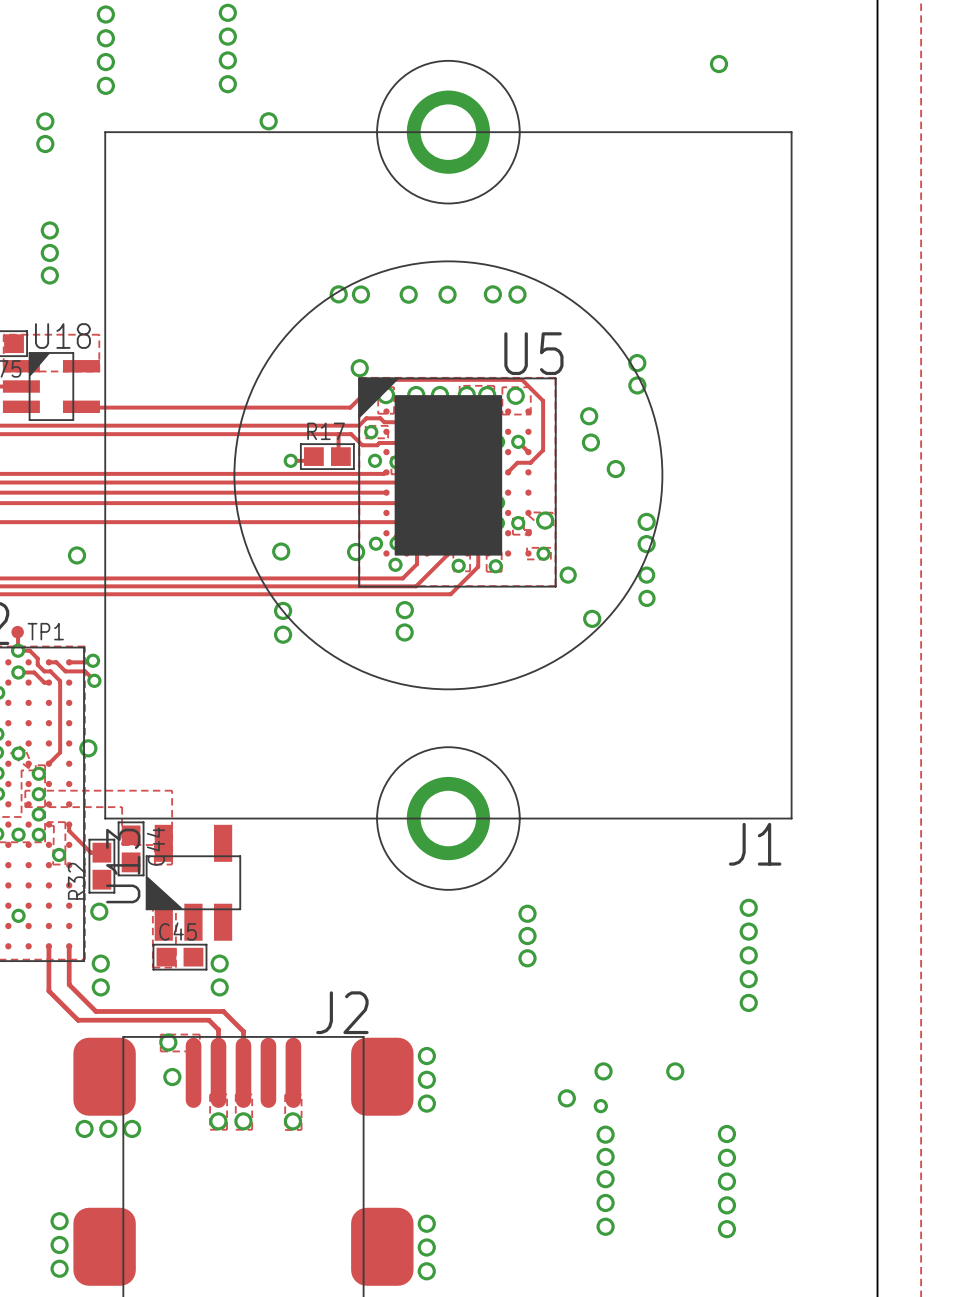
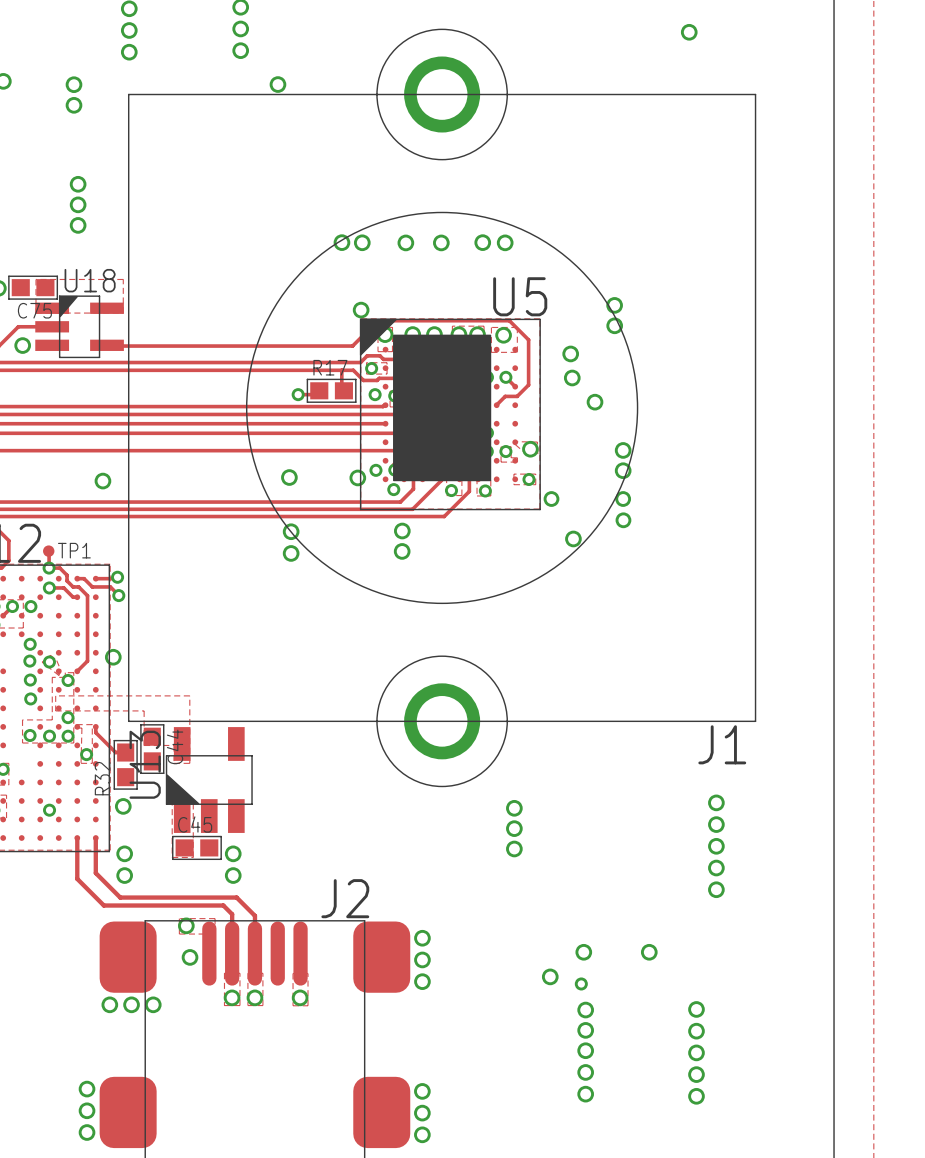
via: (38, 794) -> none

